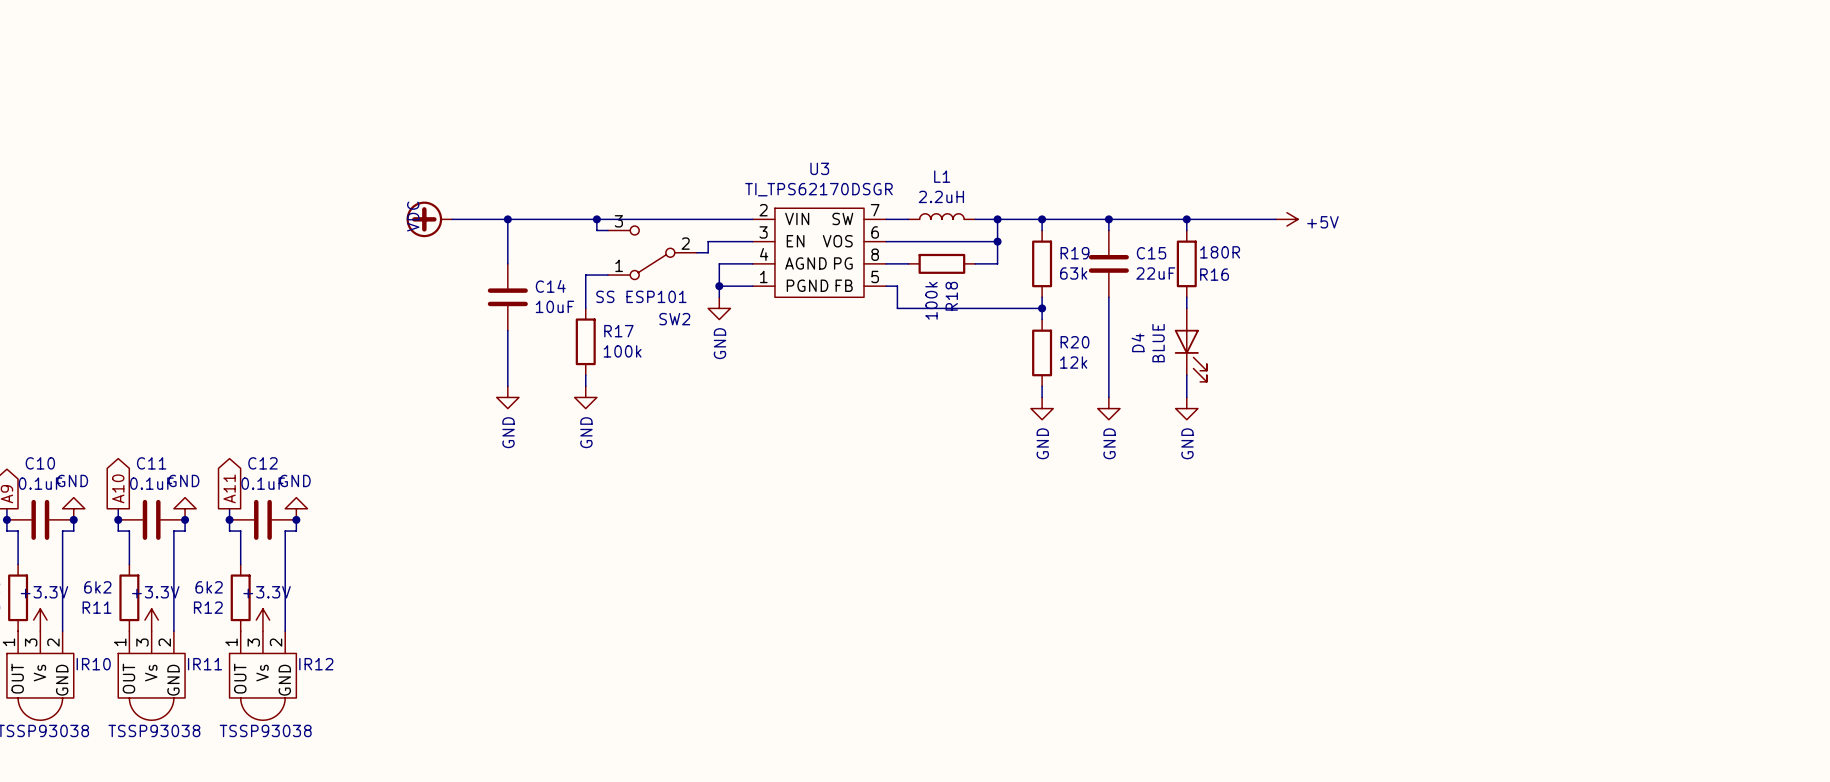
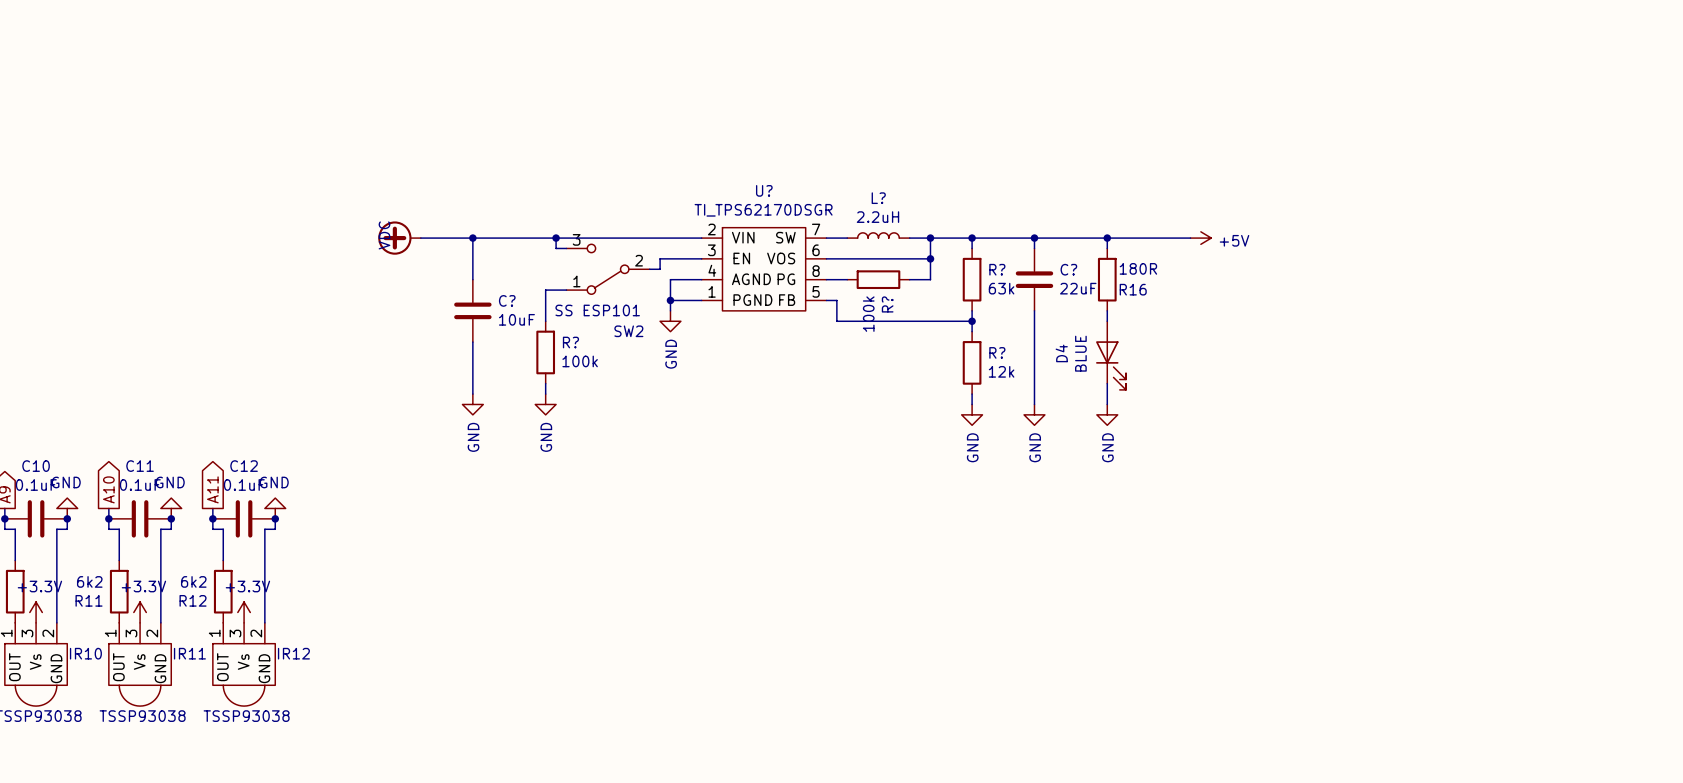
U3 name: U3 (819, 168) -> U? (764, 190)
L1 name: L1 (942, 176) -> L? (878, 198)
R19 name: R19 (1074, 253) -> R? (997, 269)
C15 name: C15 (1151, 253) -> C? (1068, 269)
C14 name: C14 (550, 286) -> C? (507, 300)
R18 name: R18 (951, 296) -> R? (887, 304)
R17 name: R17 (618, 331) -> R? (570, 342)
R20 name: R20 (1074, 342) -> R? (997, 352)

